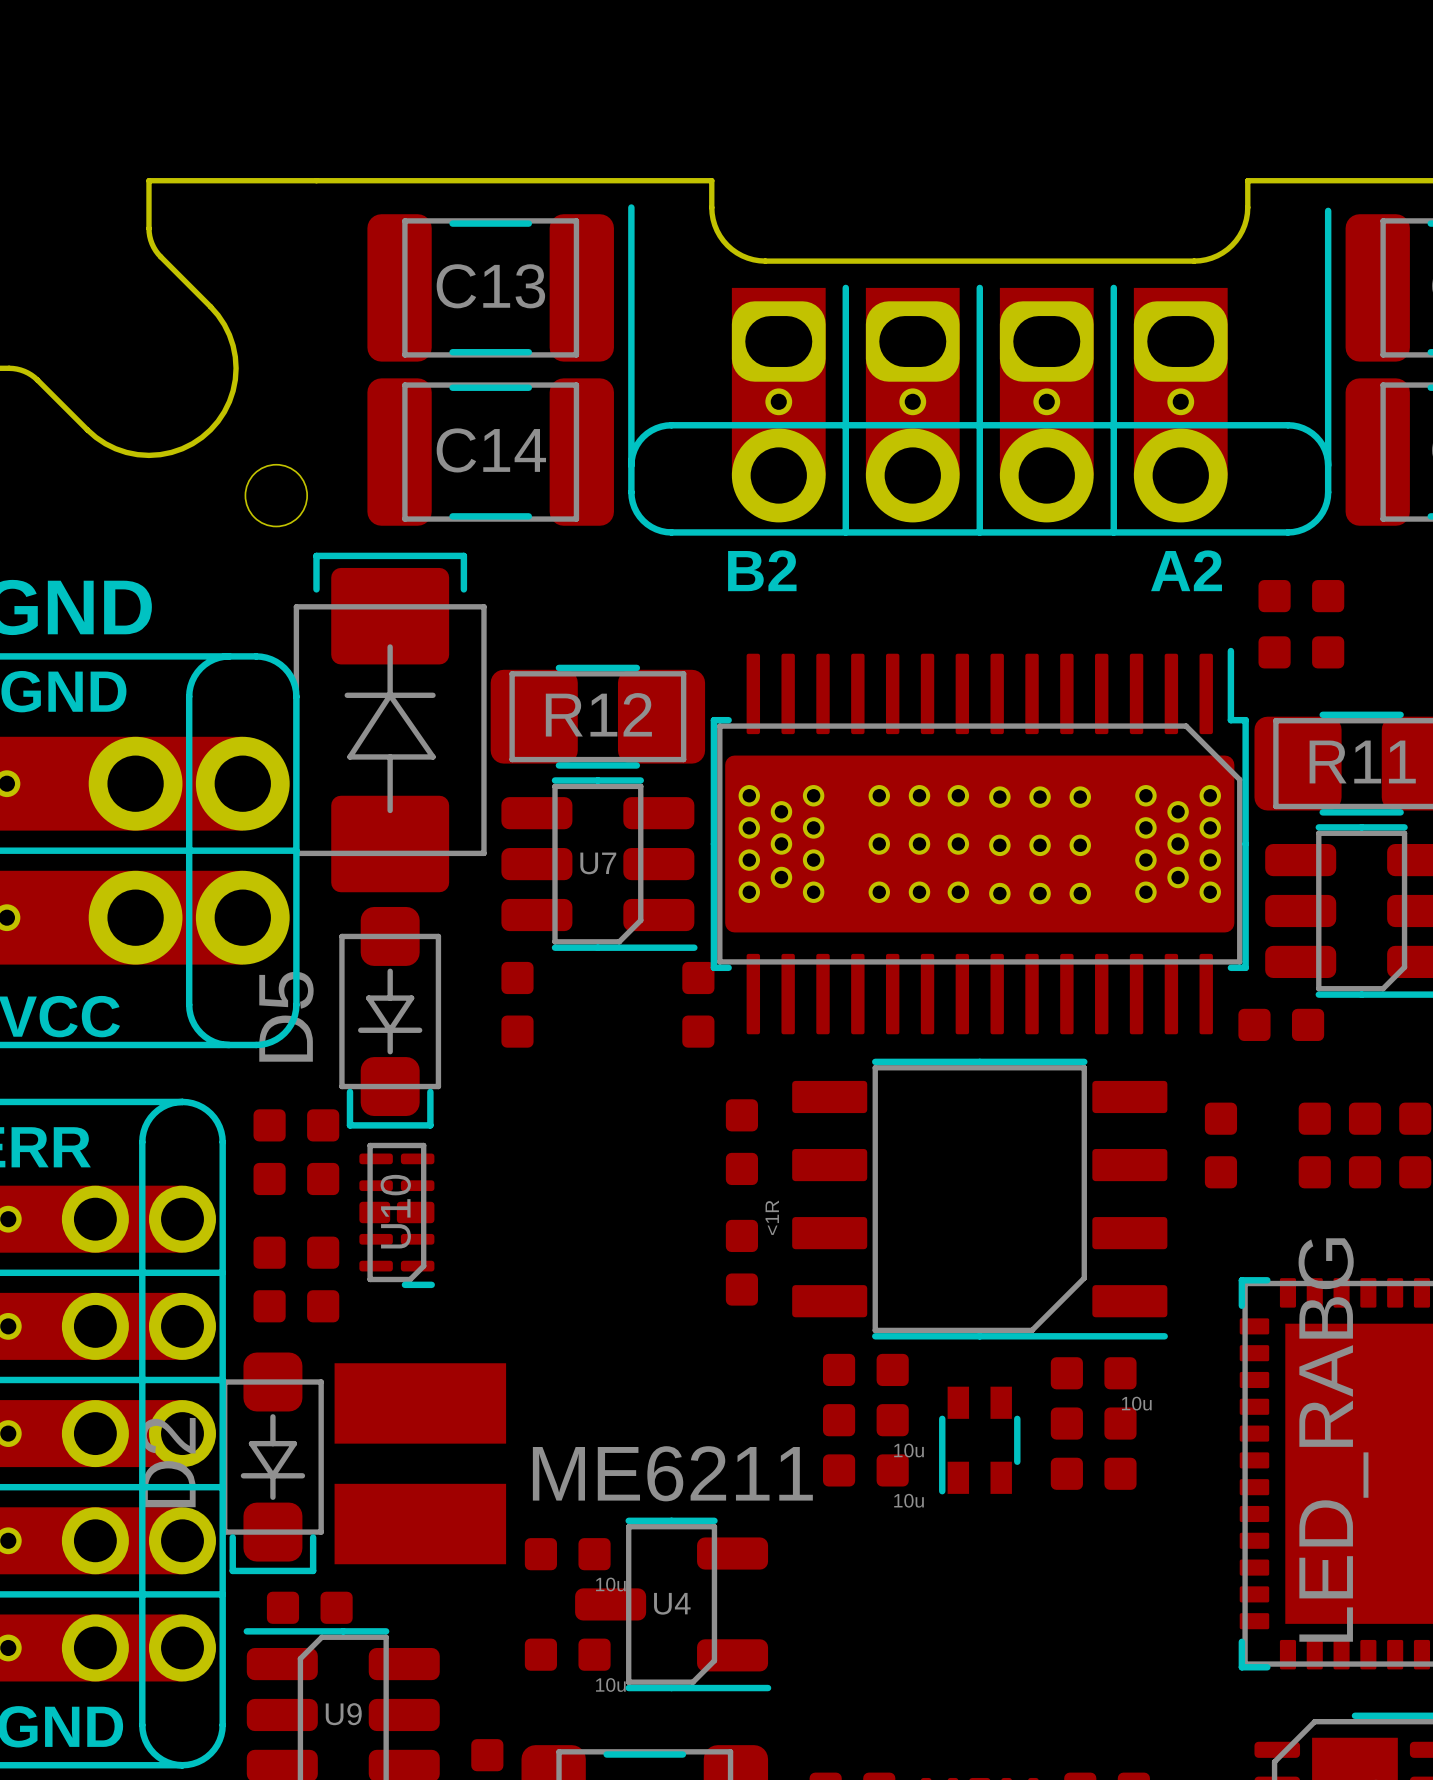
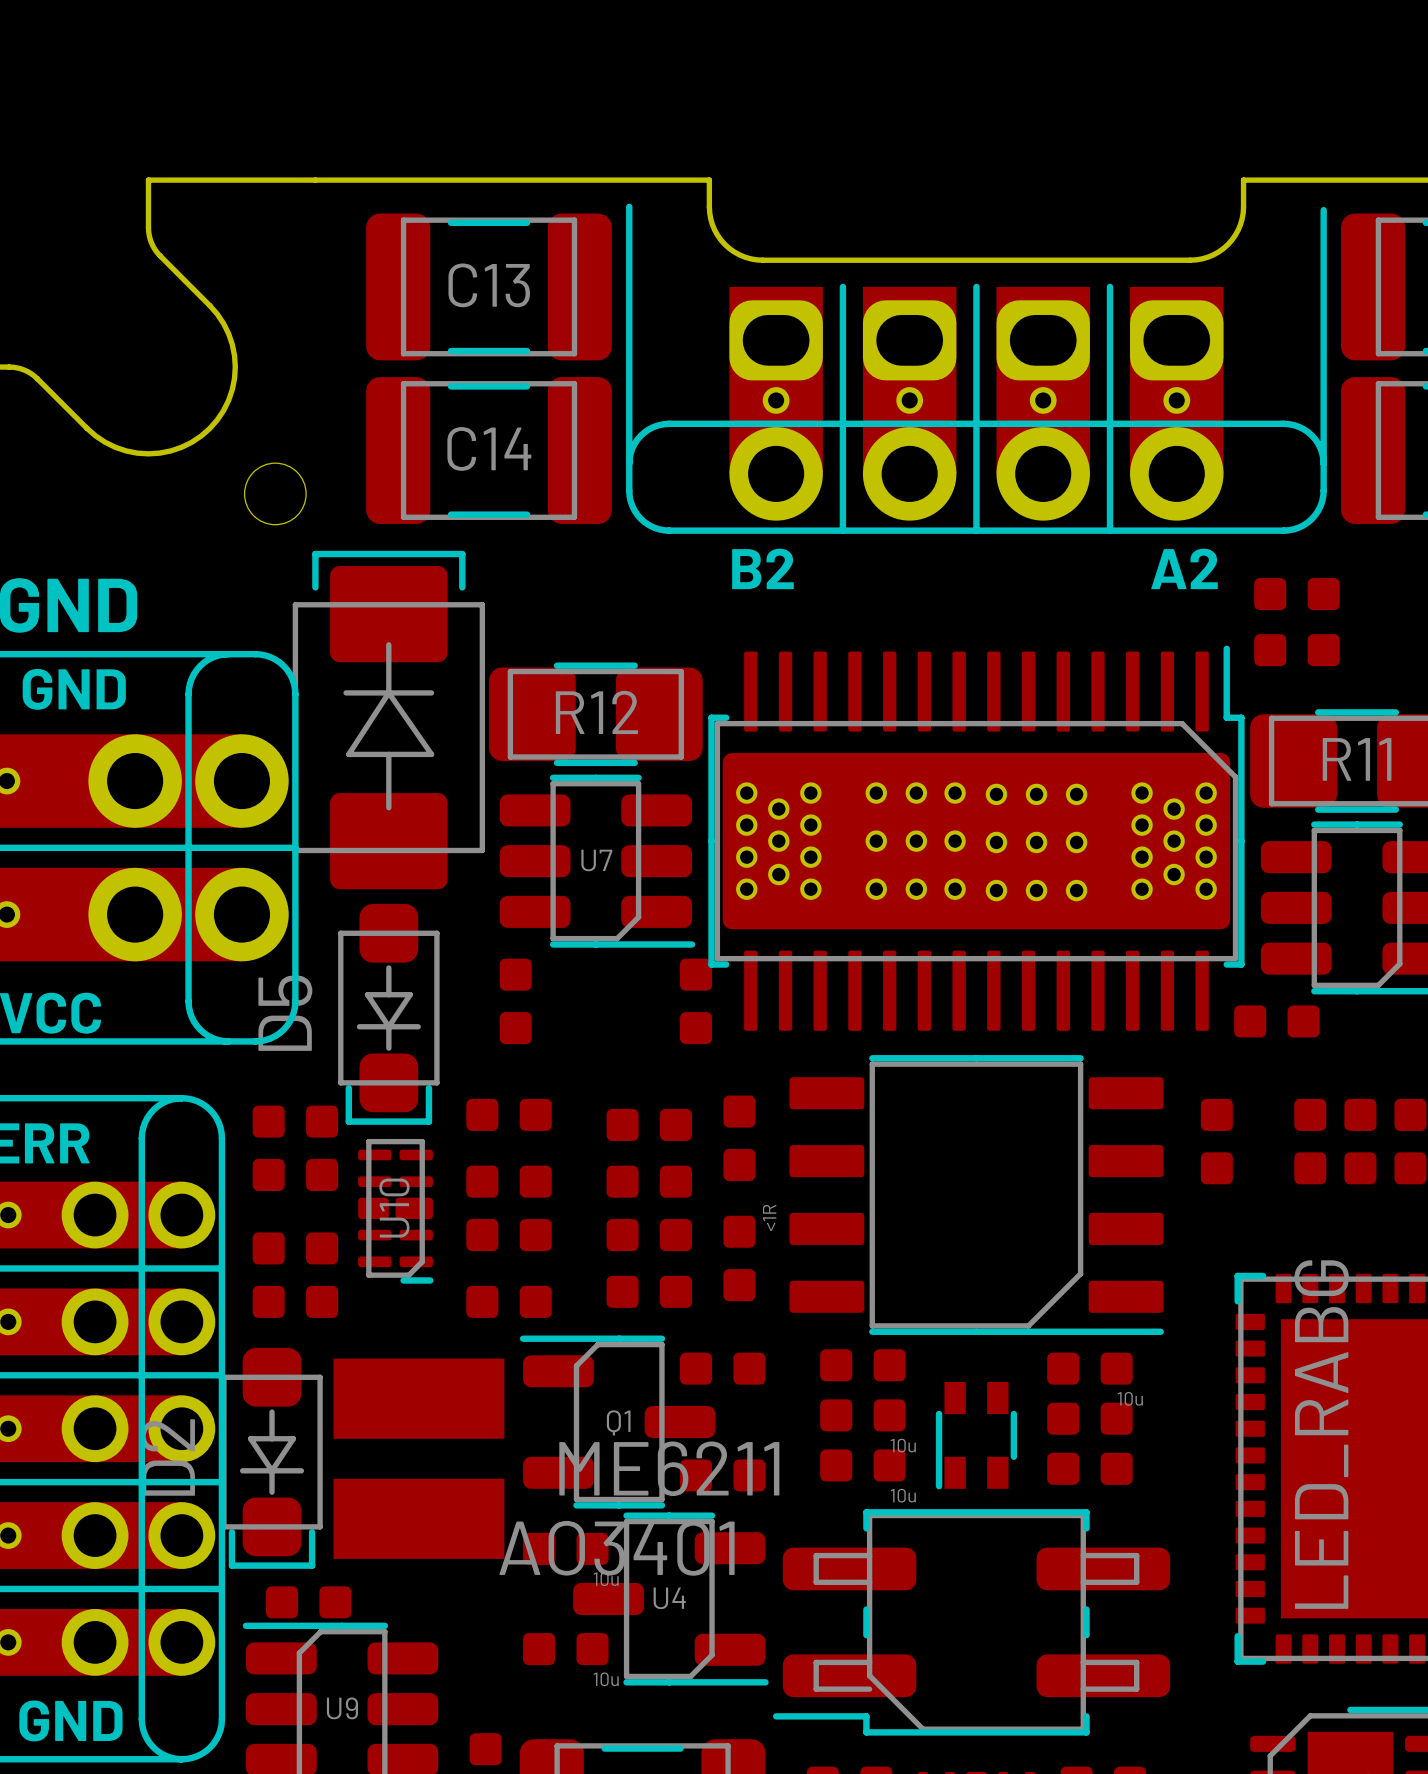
part: none -> (509, 1114)
part: none -> (649, 1124)
part: none -> (509, 1181)
part: none -> (649, 1181)
part: none -> (509, 1235)
part: none -> (649, 1235)
part: none -> (649, 1291)
part: none -> (509, 1301)
part: none -> (722, 1368)
Q1: none -> AO3401 (617, 1422)
part: none -> (722, 1475)
part: none -> (971, 1622)

